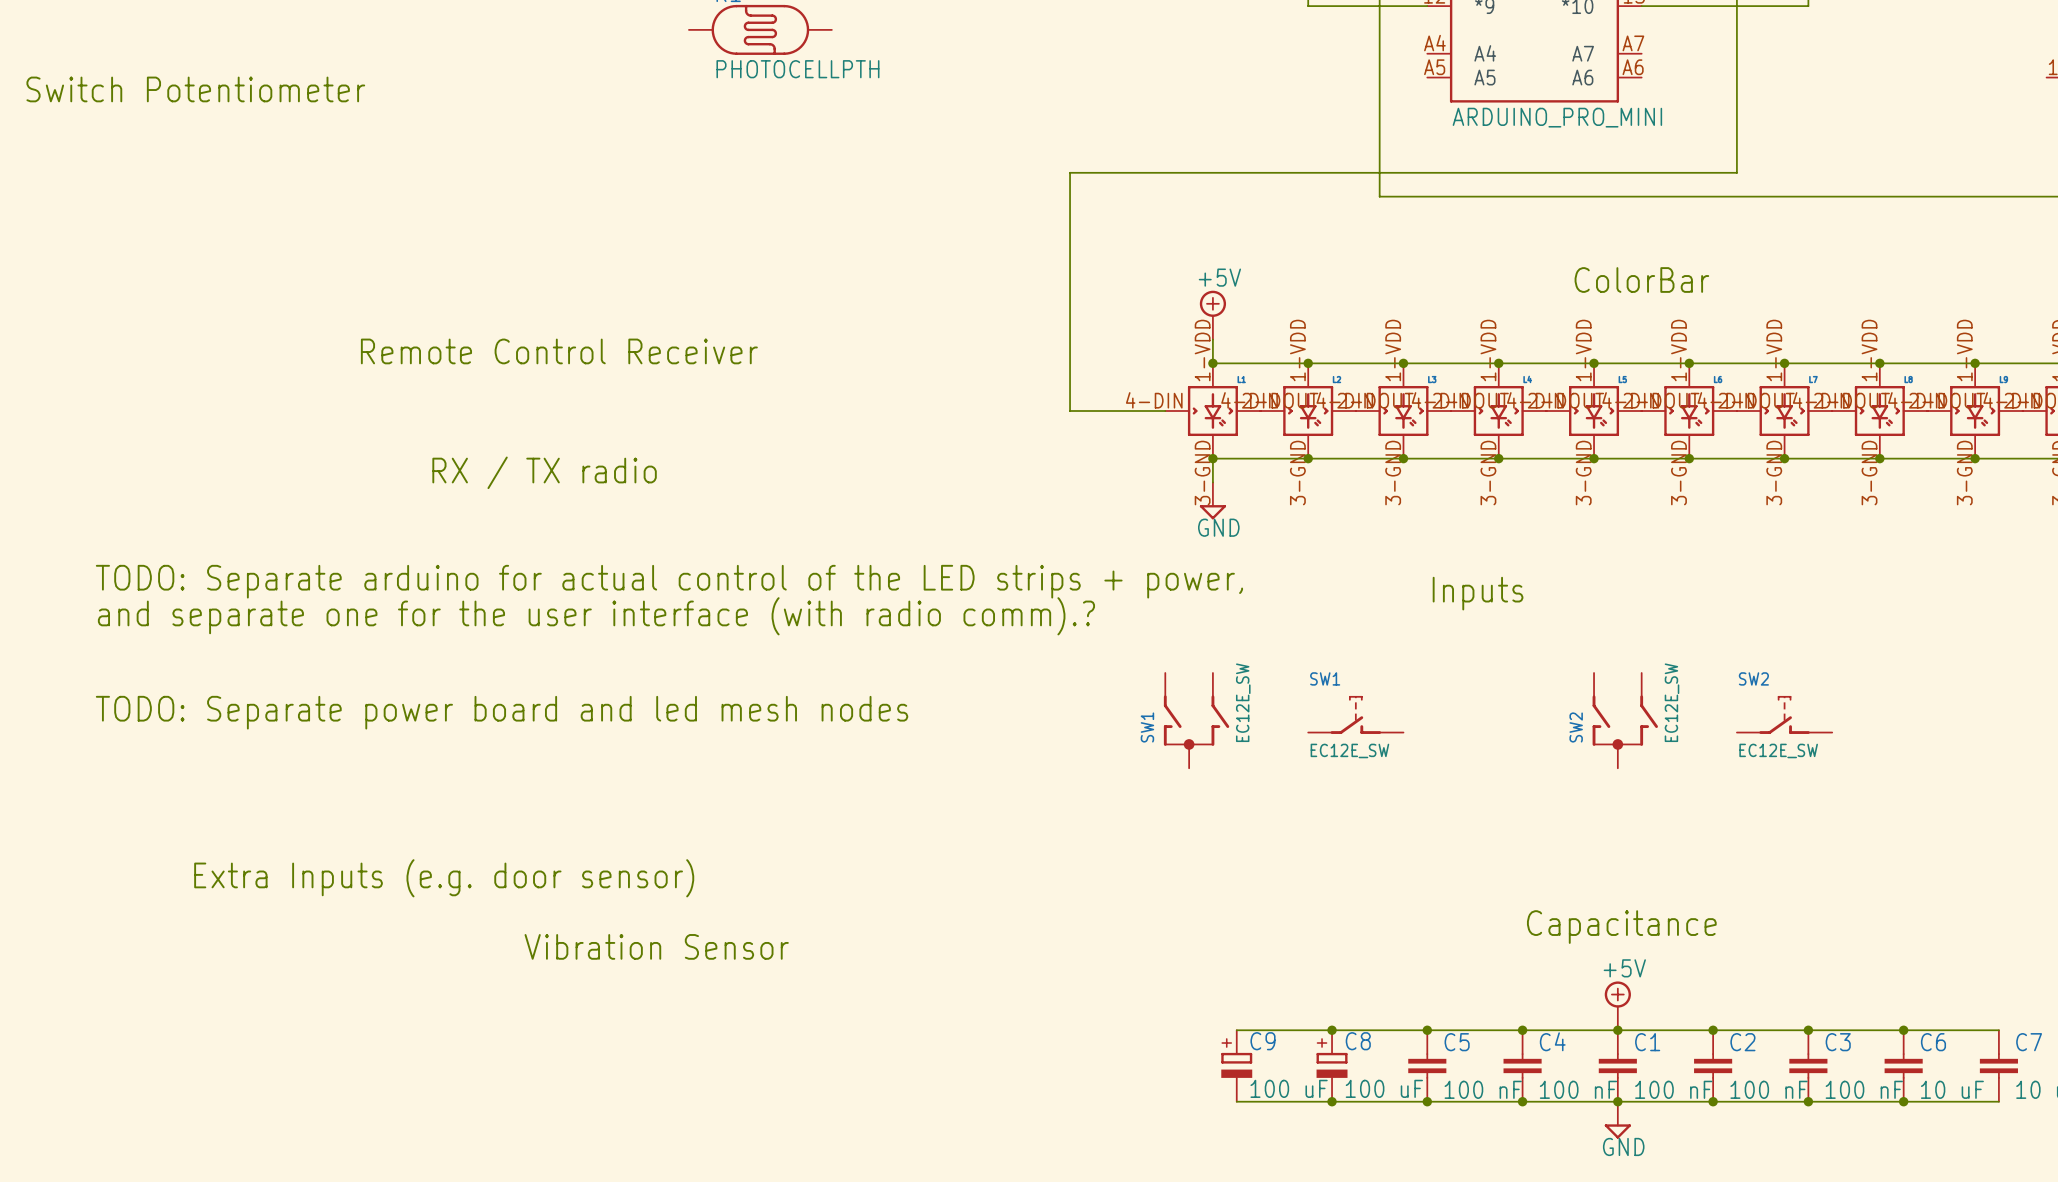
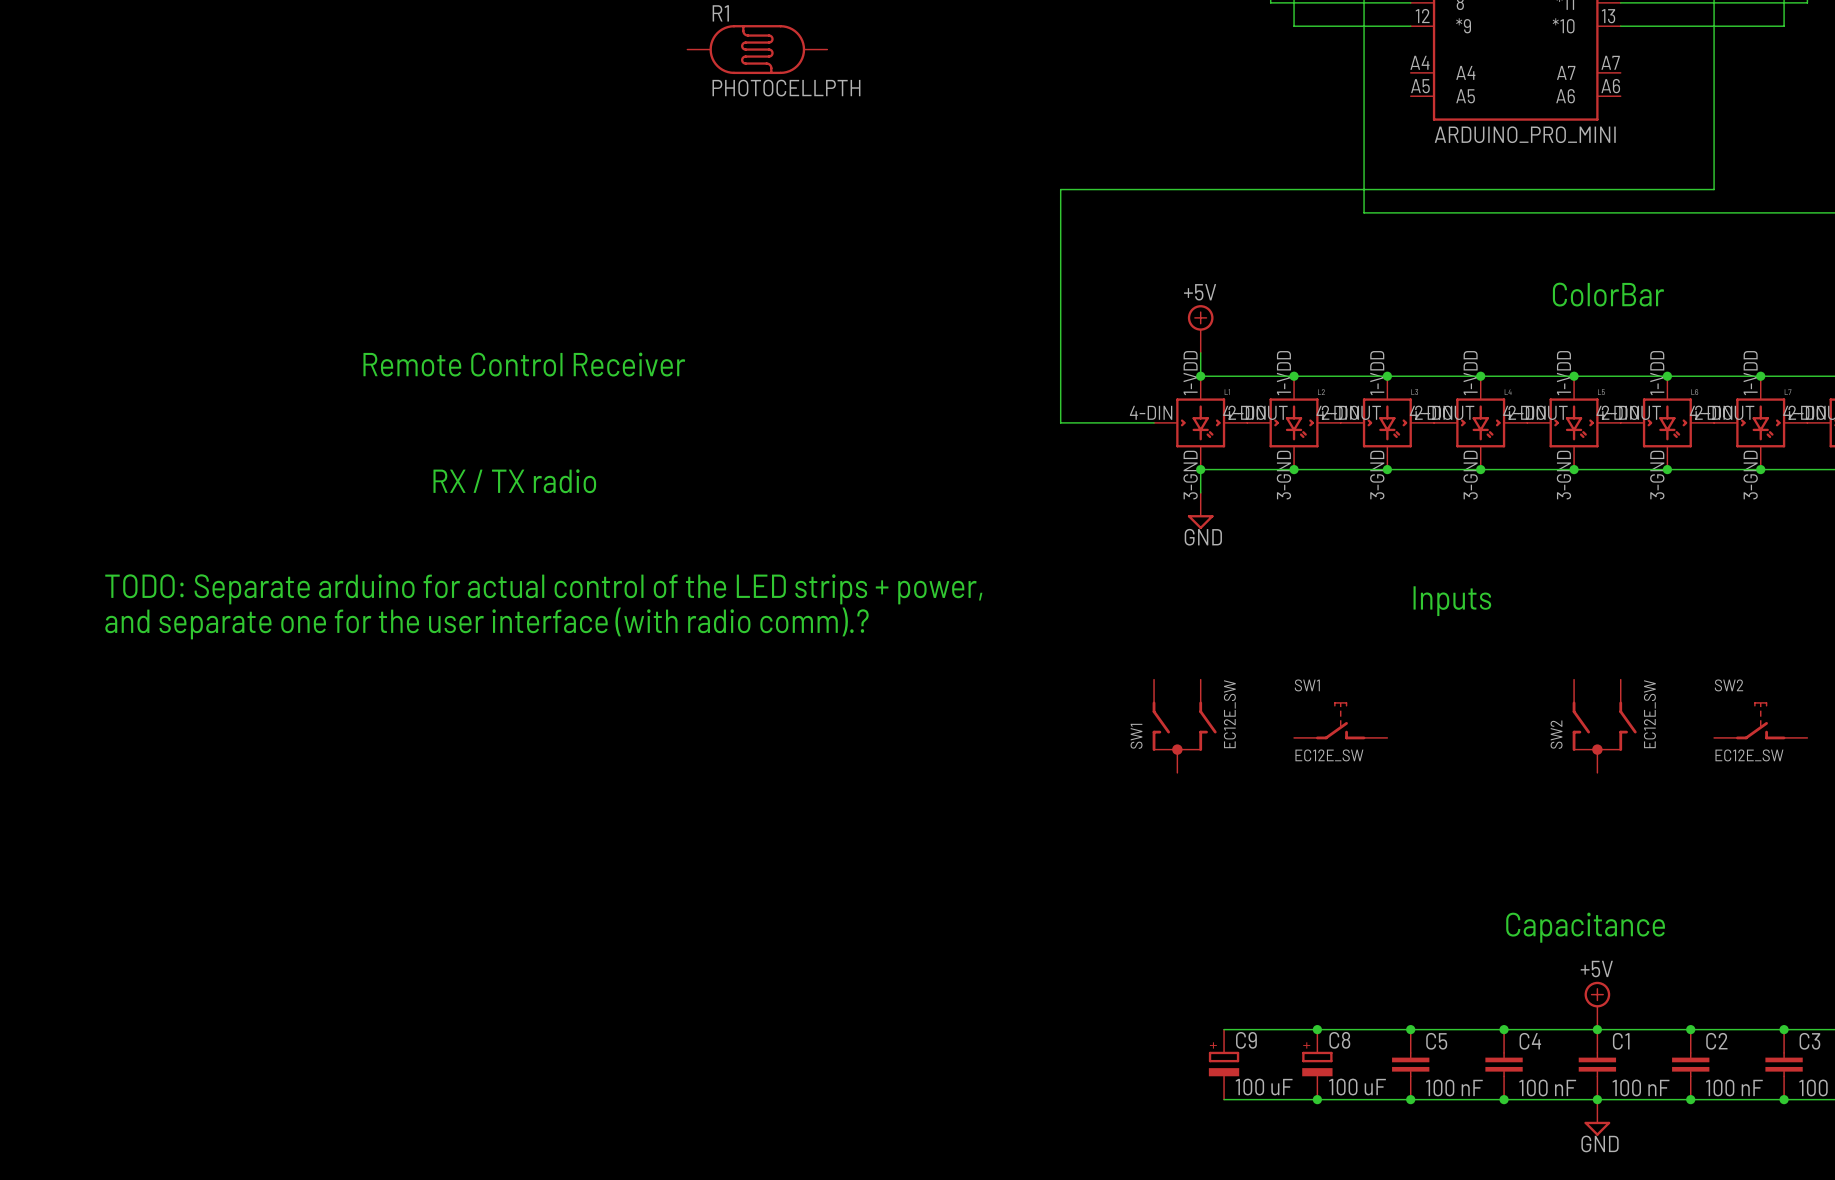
text: Switch Potentiometer (195, 89) -> none
text: TODO: Separate power board and led mesh nodes (502, 712) -> none
text: Extra Inputs (e.g. door sensor) (444, 878) -> none
text: Vibration Sensor (656, 946) -> none

